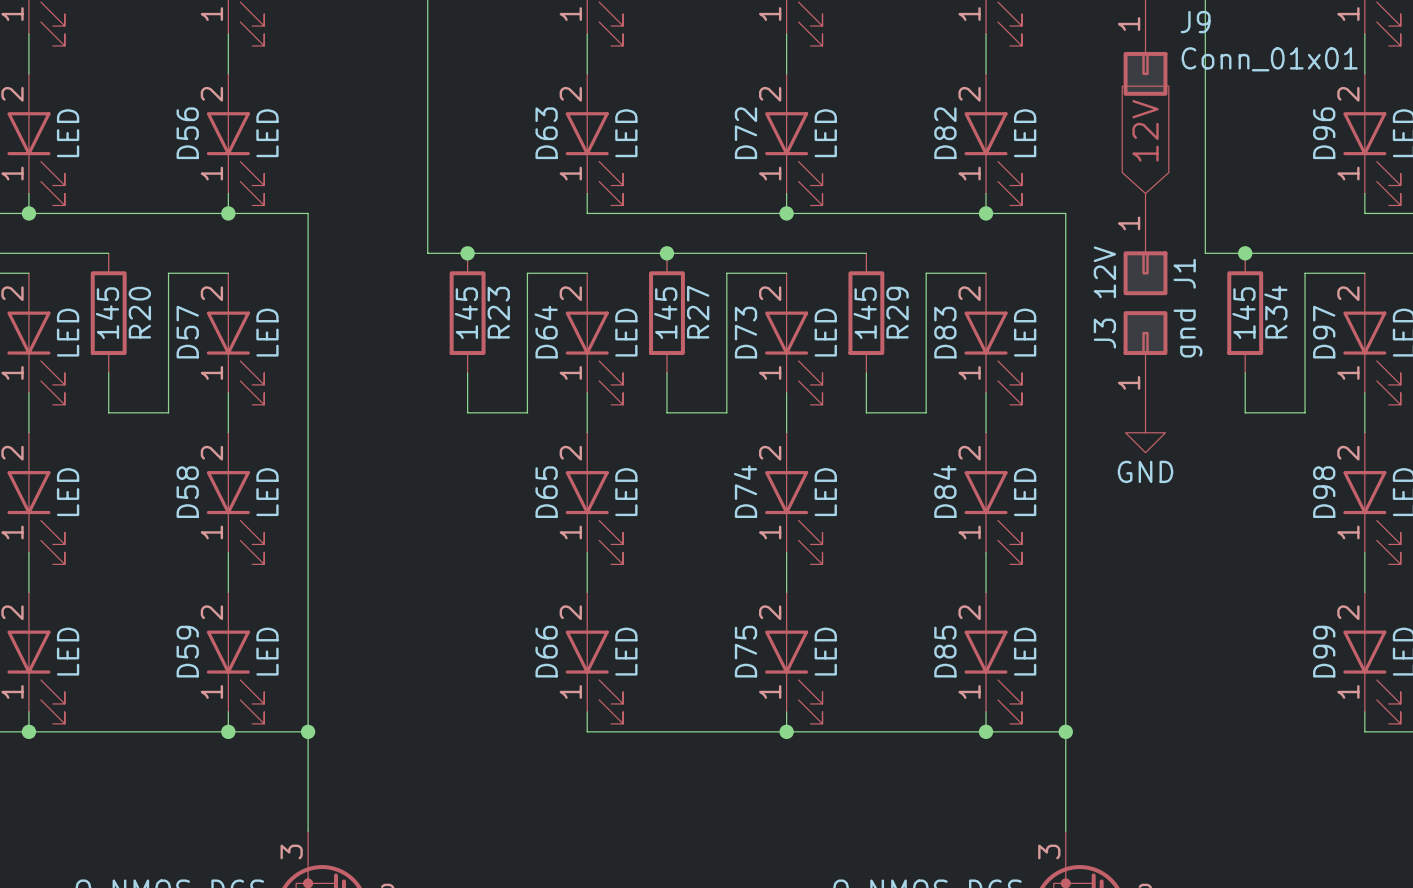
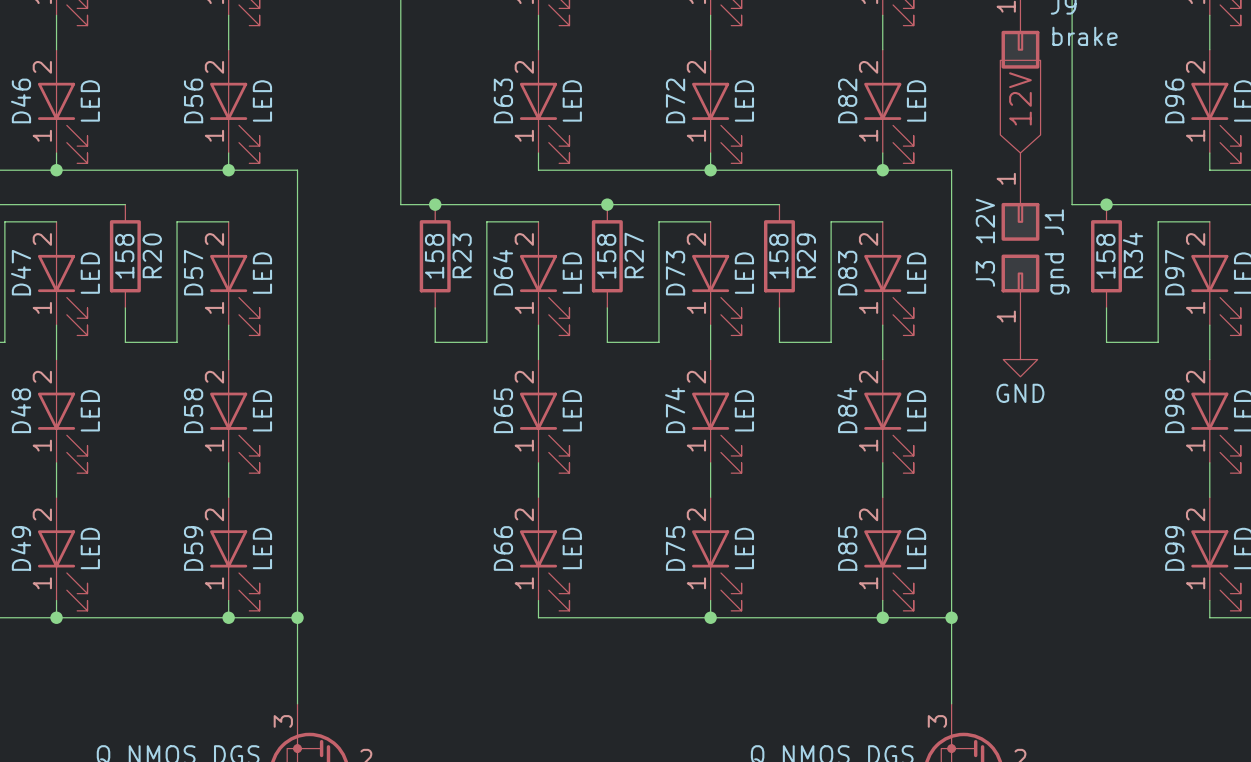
J9 value: Conn_01x01 (1269, 59) -> brake (1085, 36)
R20 value: 145 (107, 313) -> 158 (124, 256)
R23 value: 145 (466, 313) -> 158 (434, 256)
R27 value: 145 (665, 313) -> 158 (606, 256)
R29 value: 145 (865, 313) -> 158 (778, 256)
R34 value: 145 (1243, 313) -> 158 (1105, 256)

